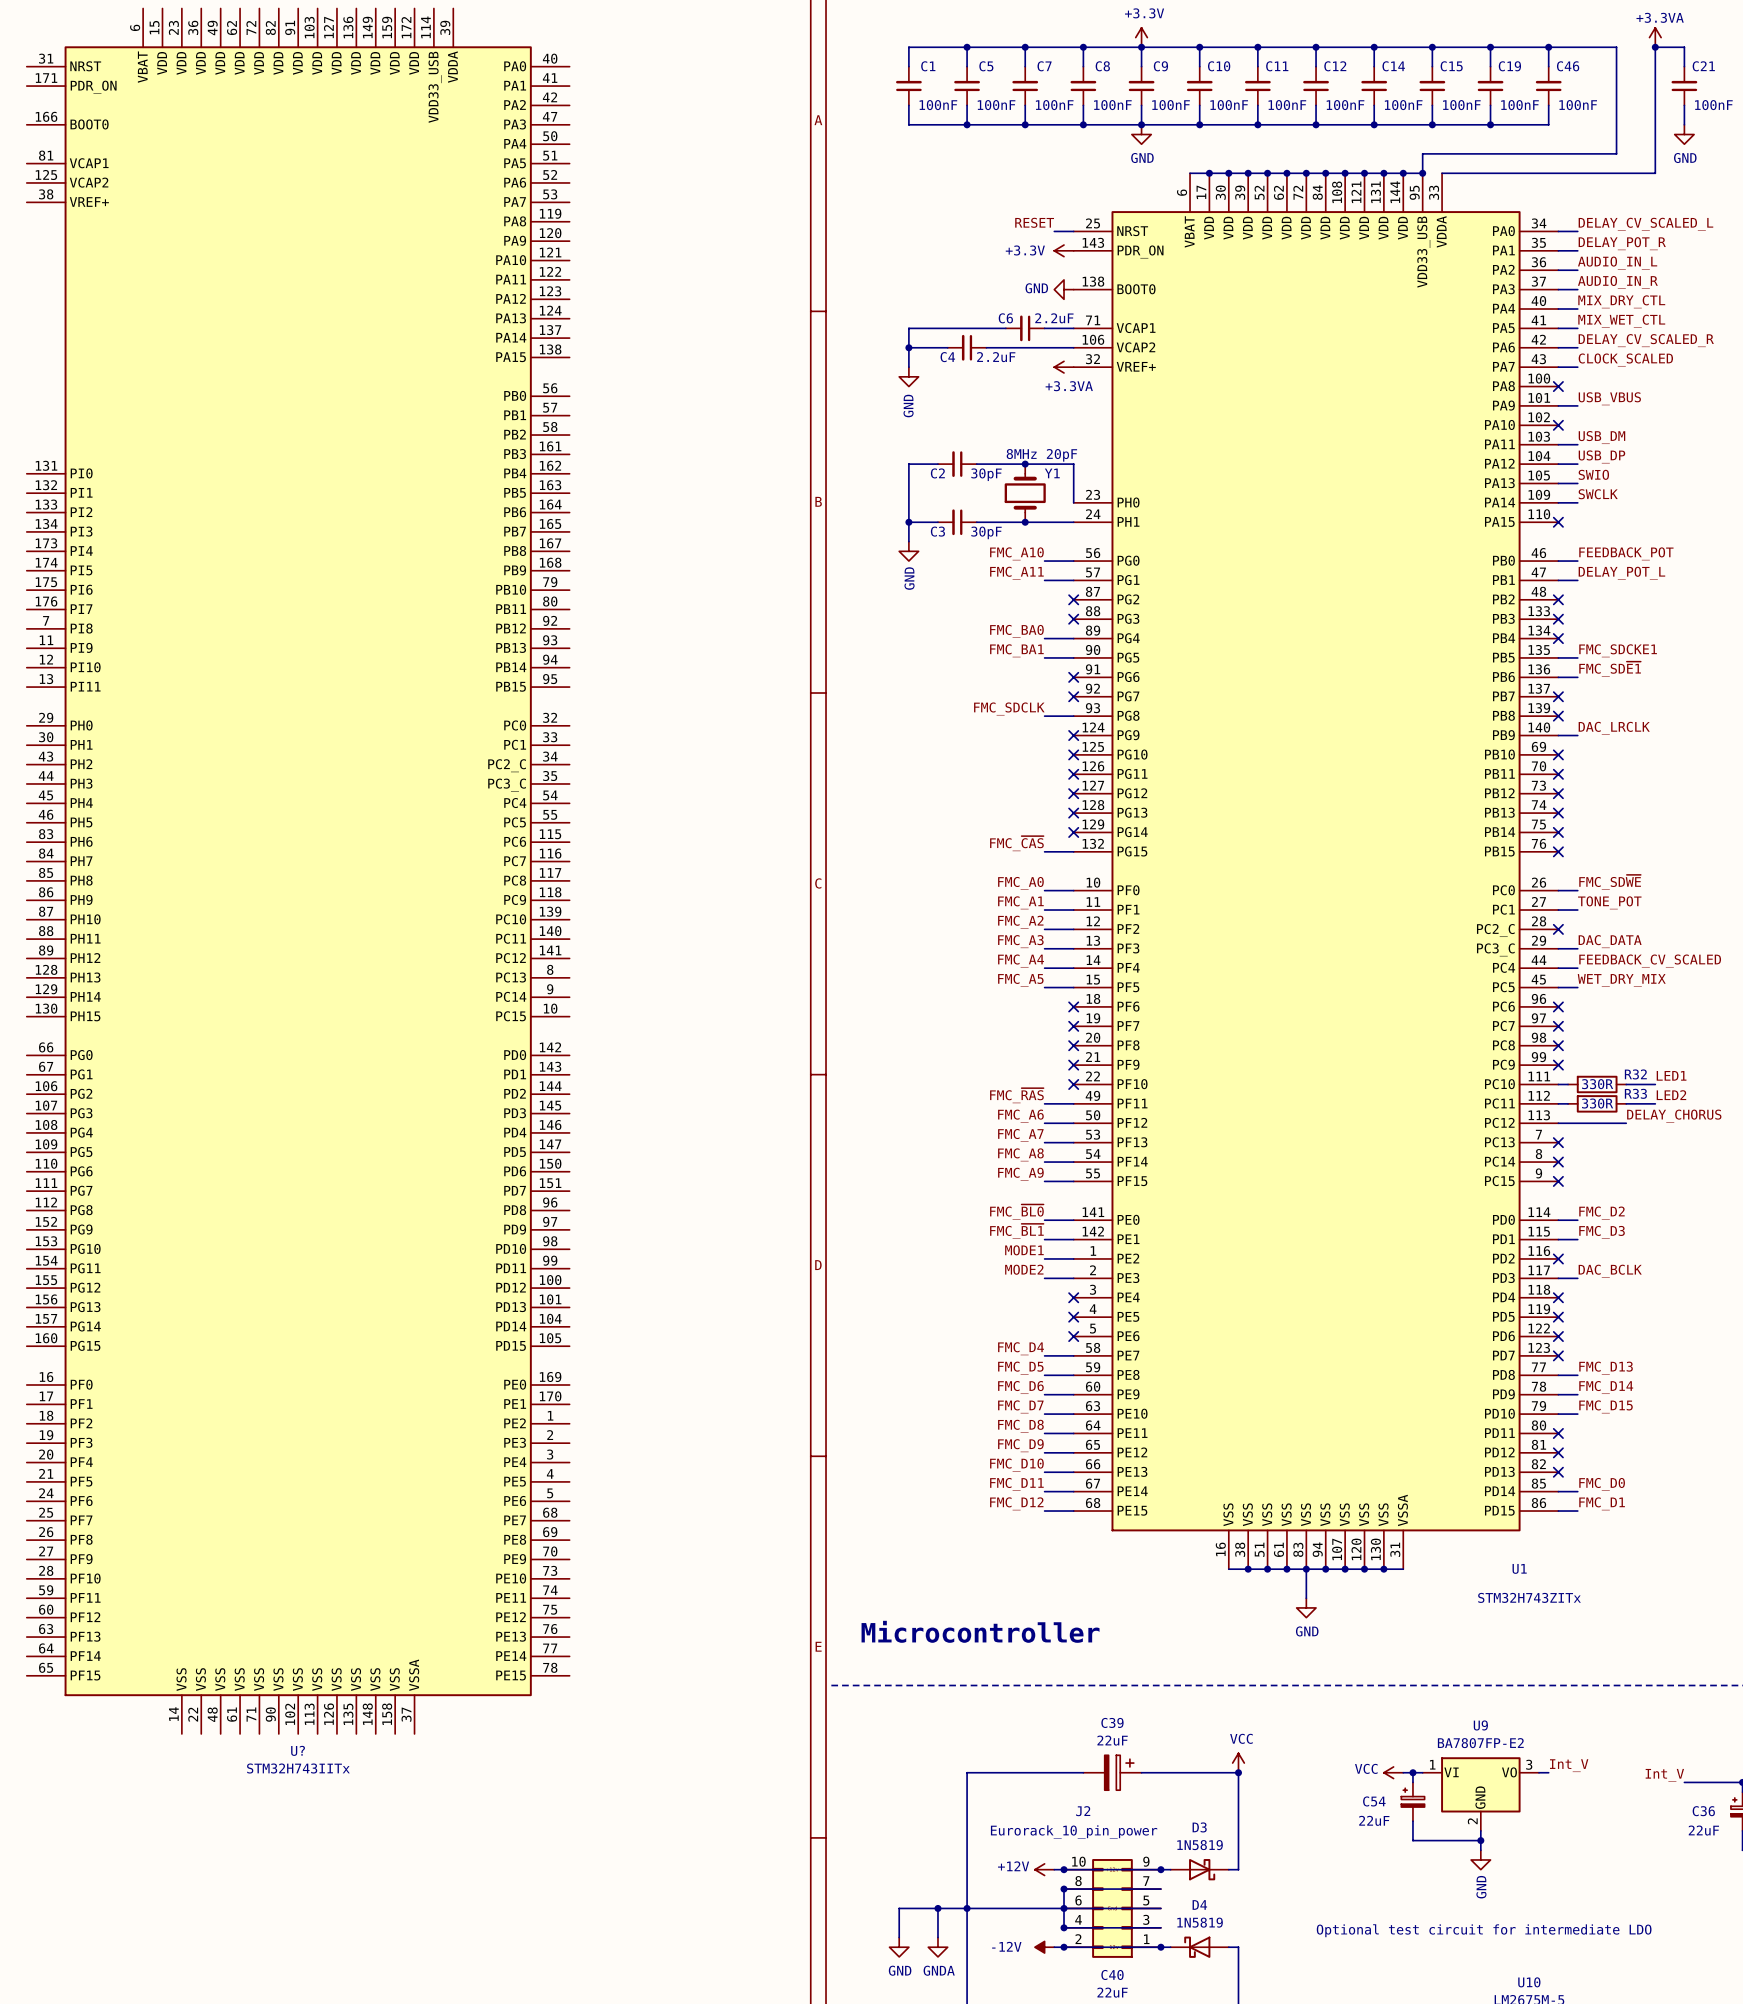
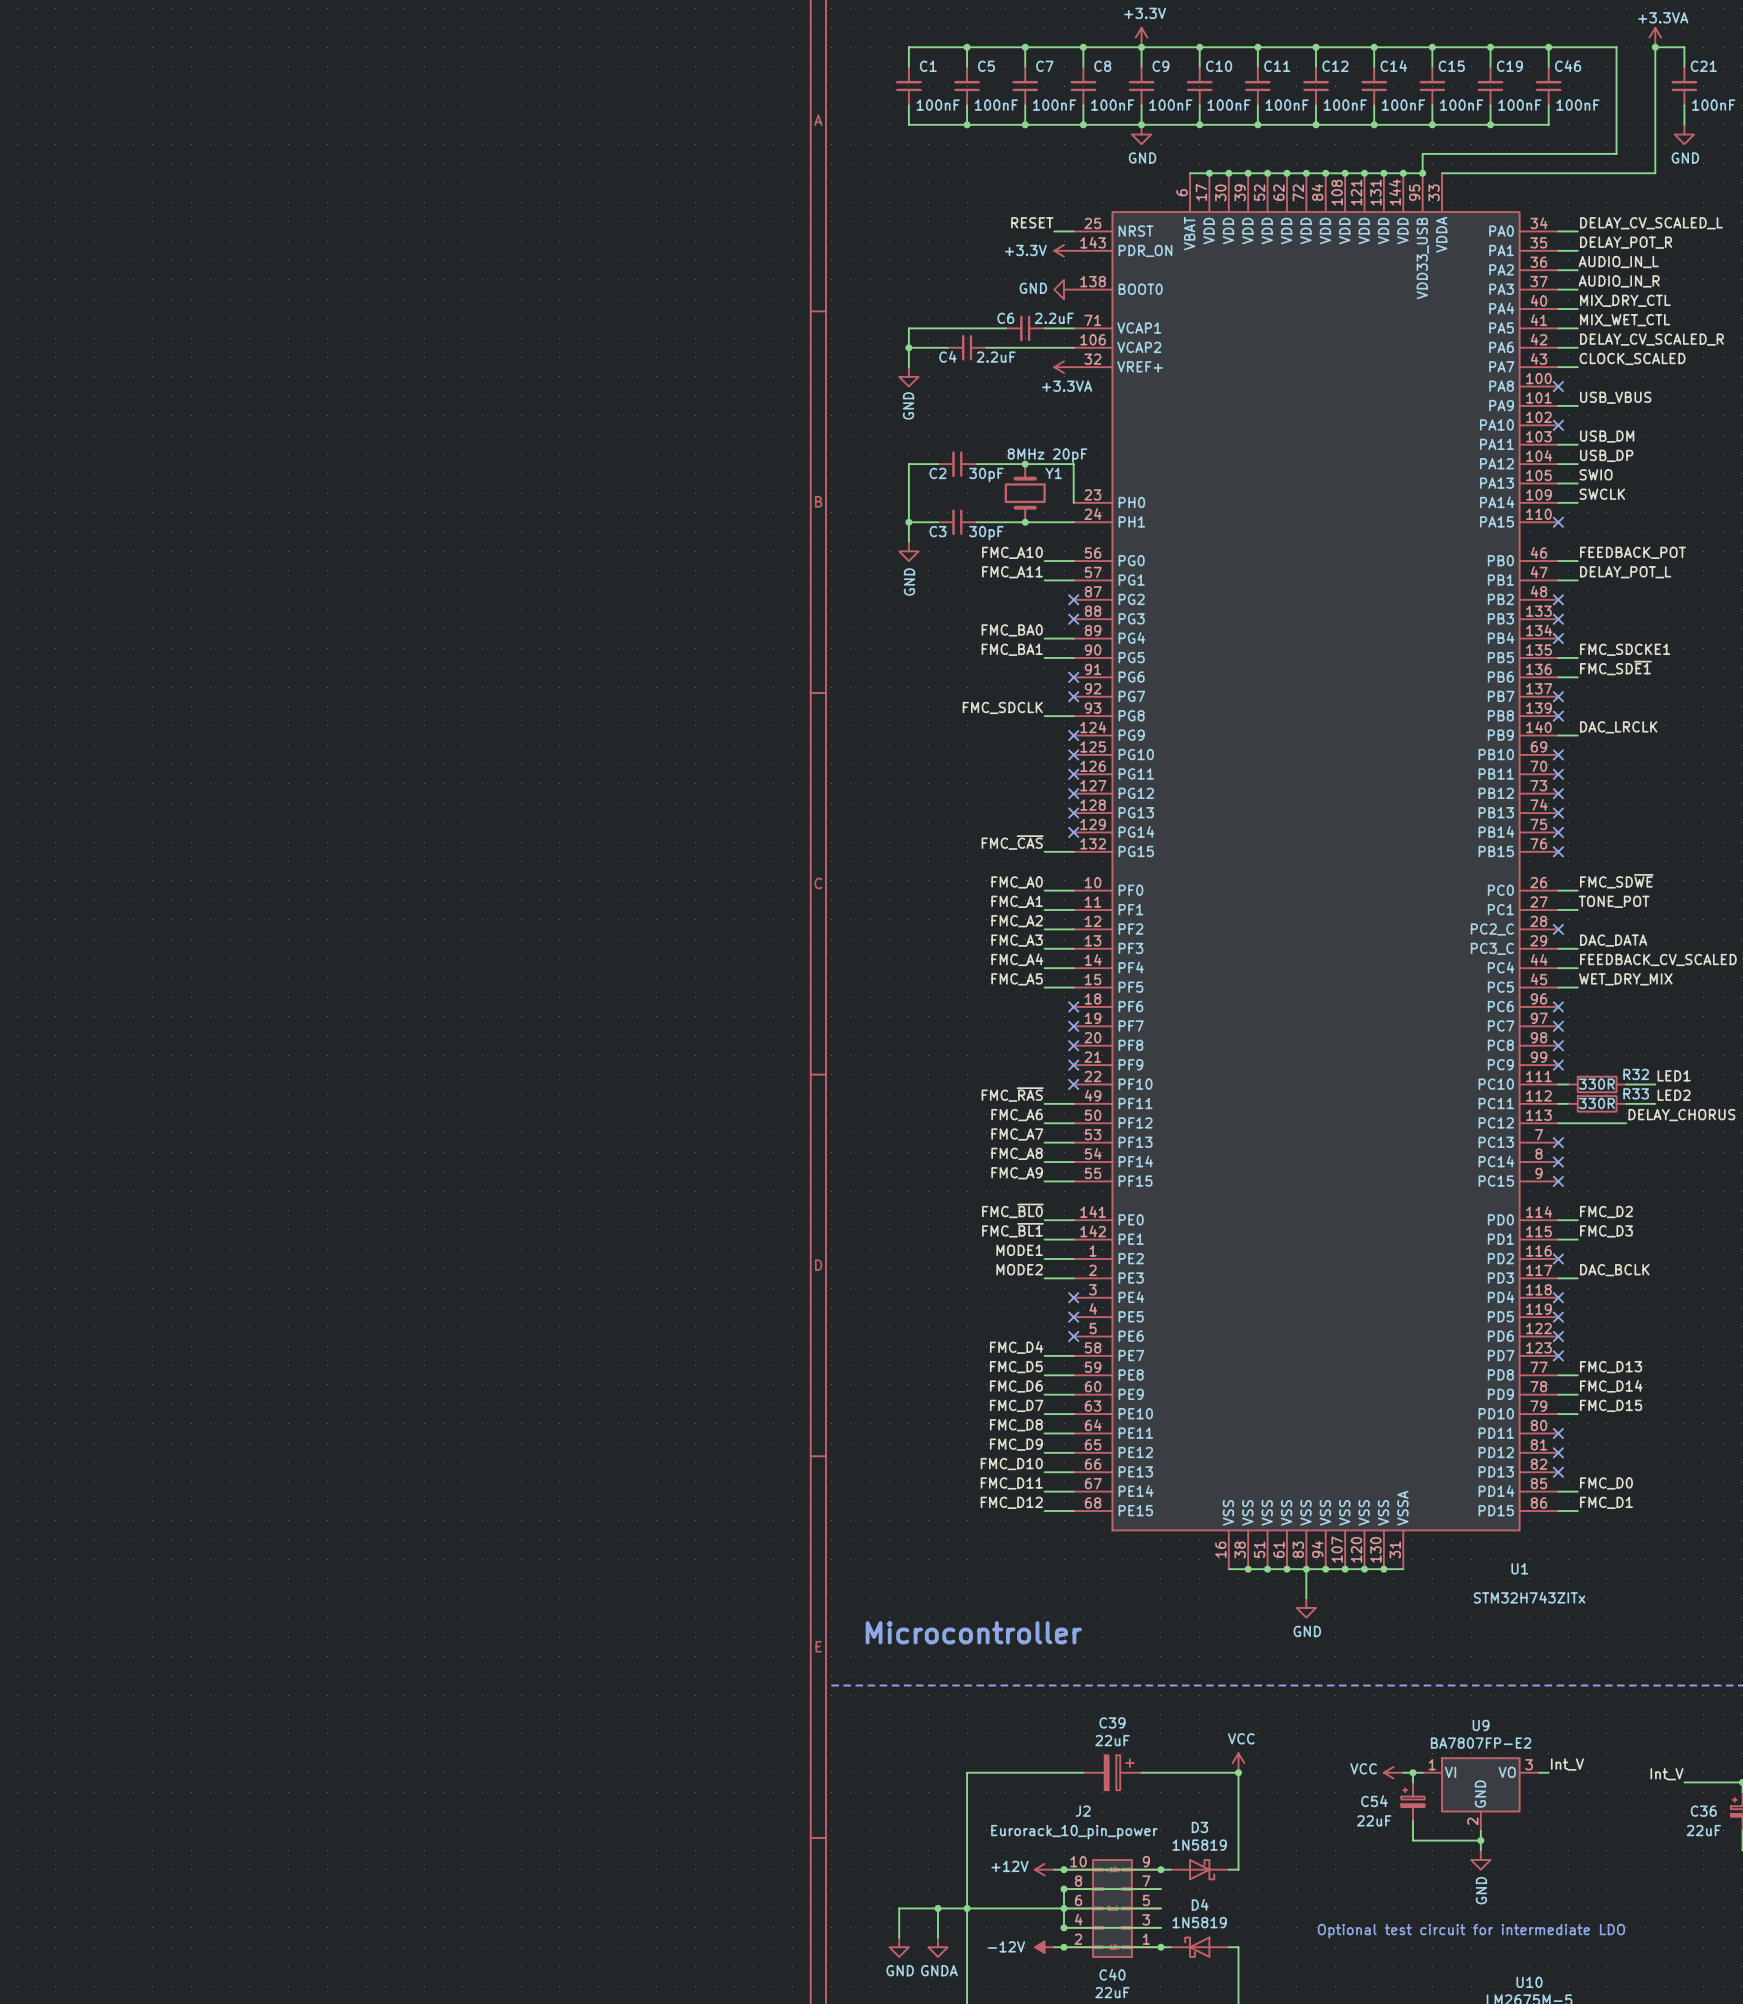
U?: STM32H743IITx (298, 871) -> none

